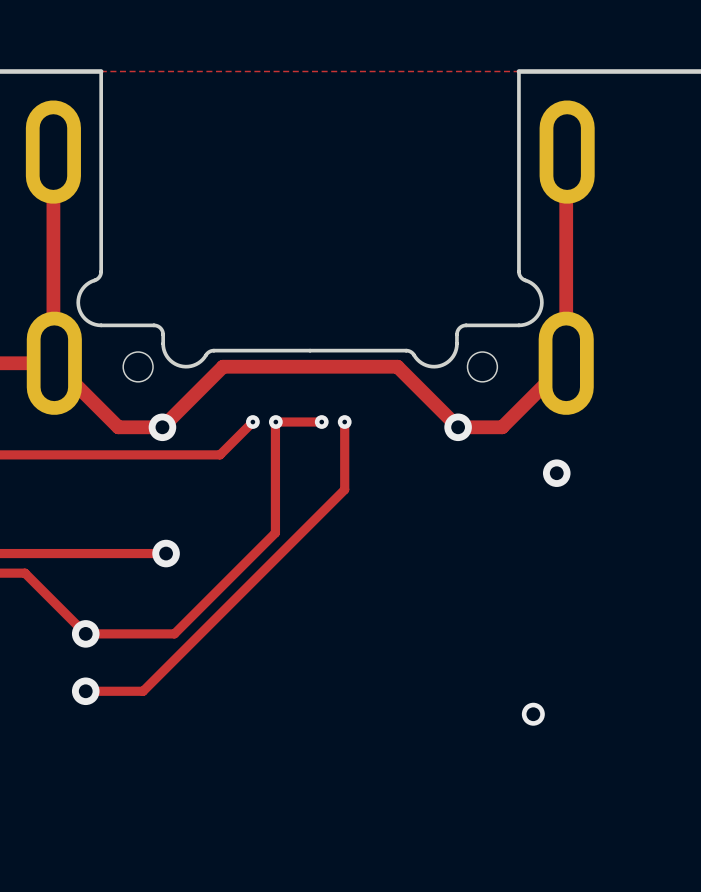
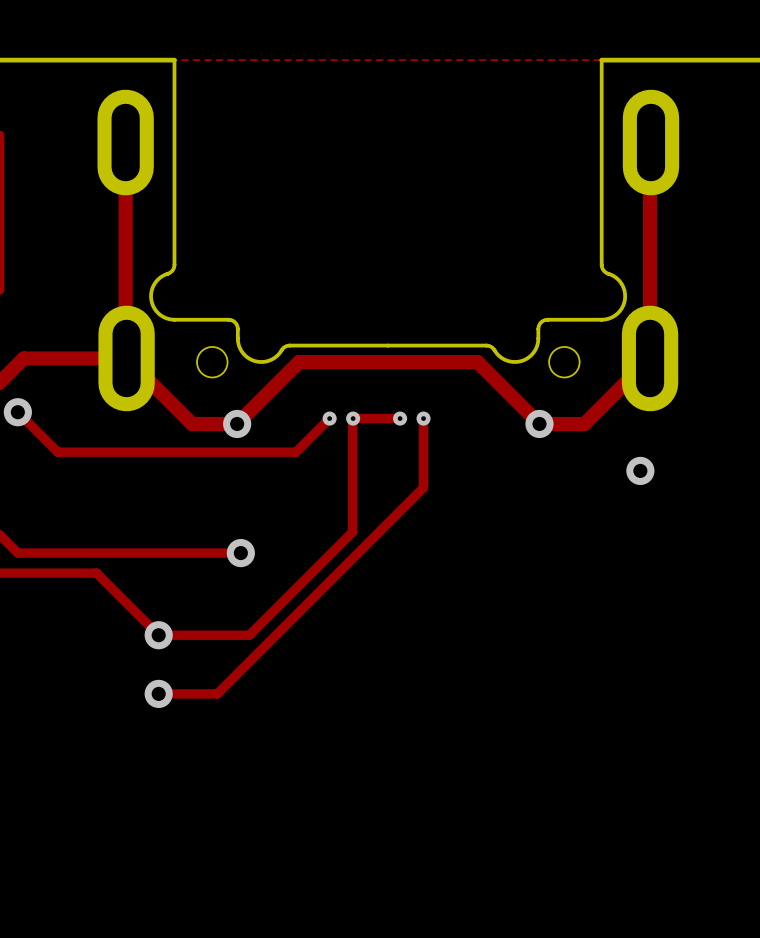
via: (533, 714) -> none

